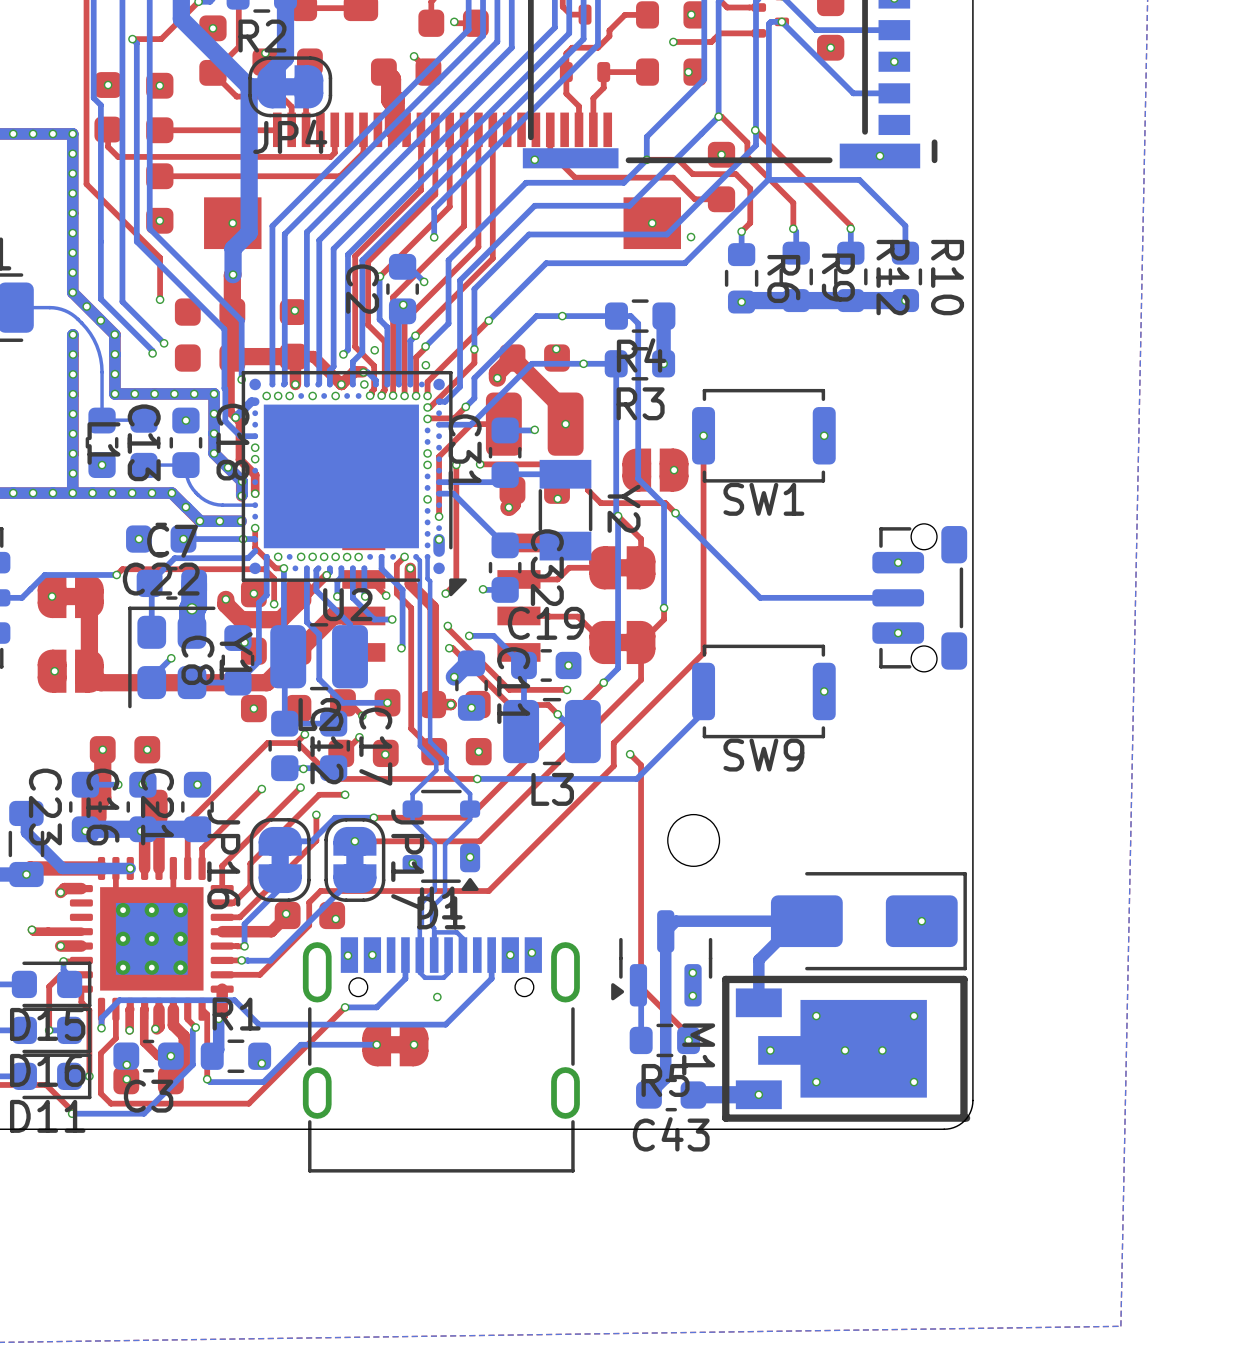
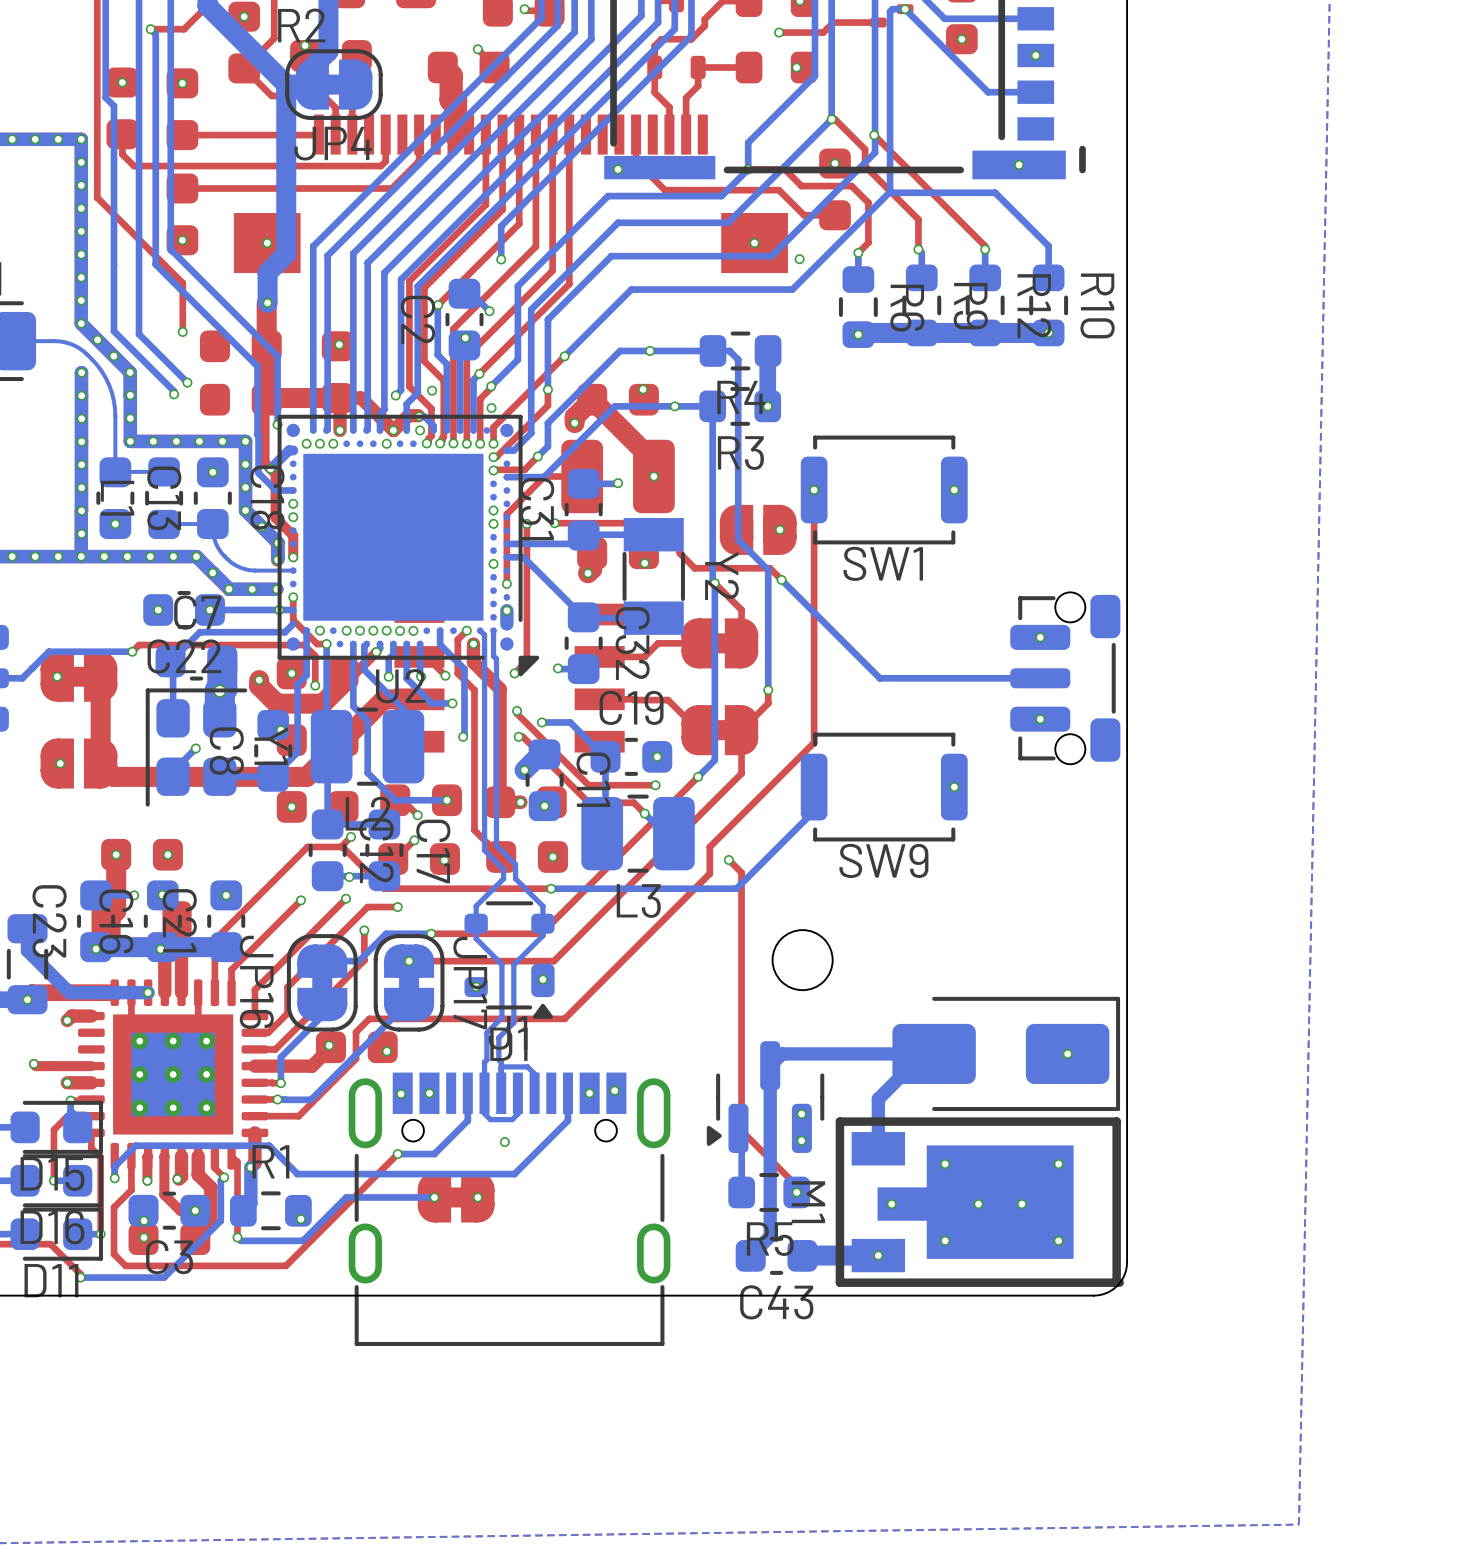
via: (312, 395) -> none

